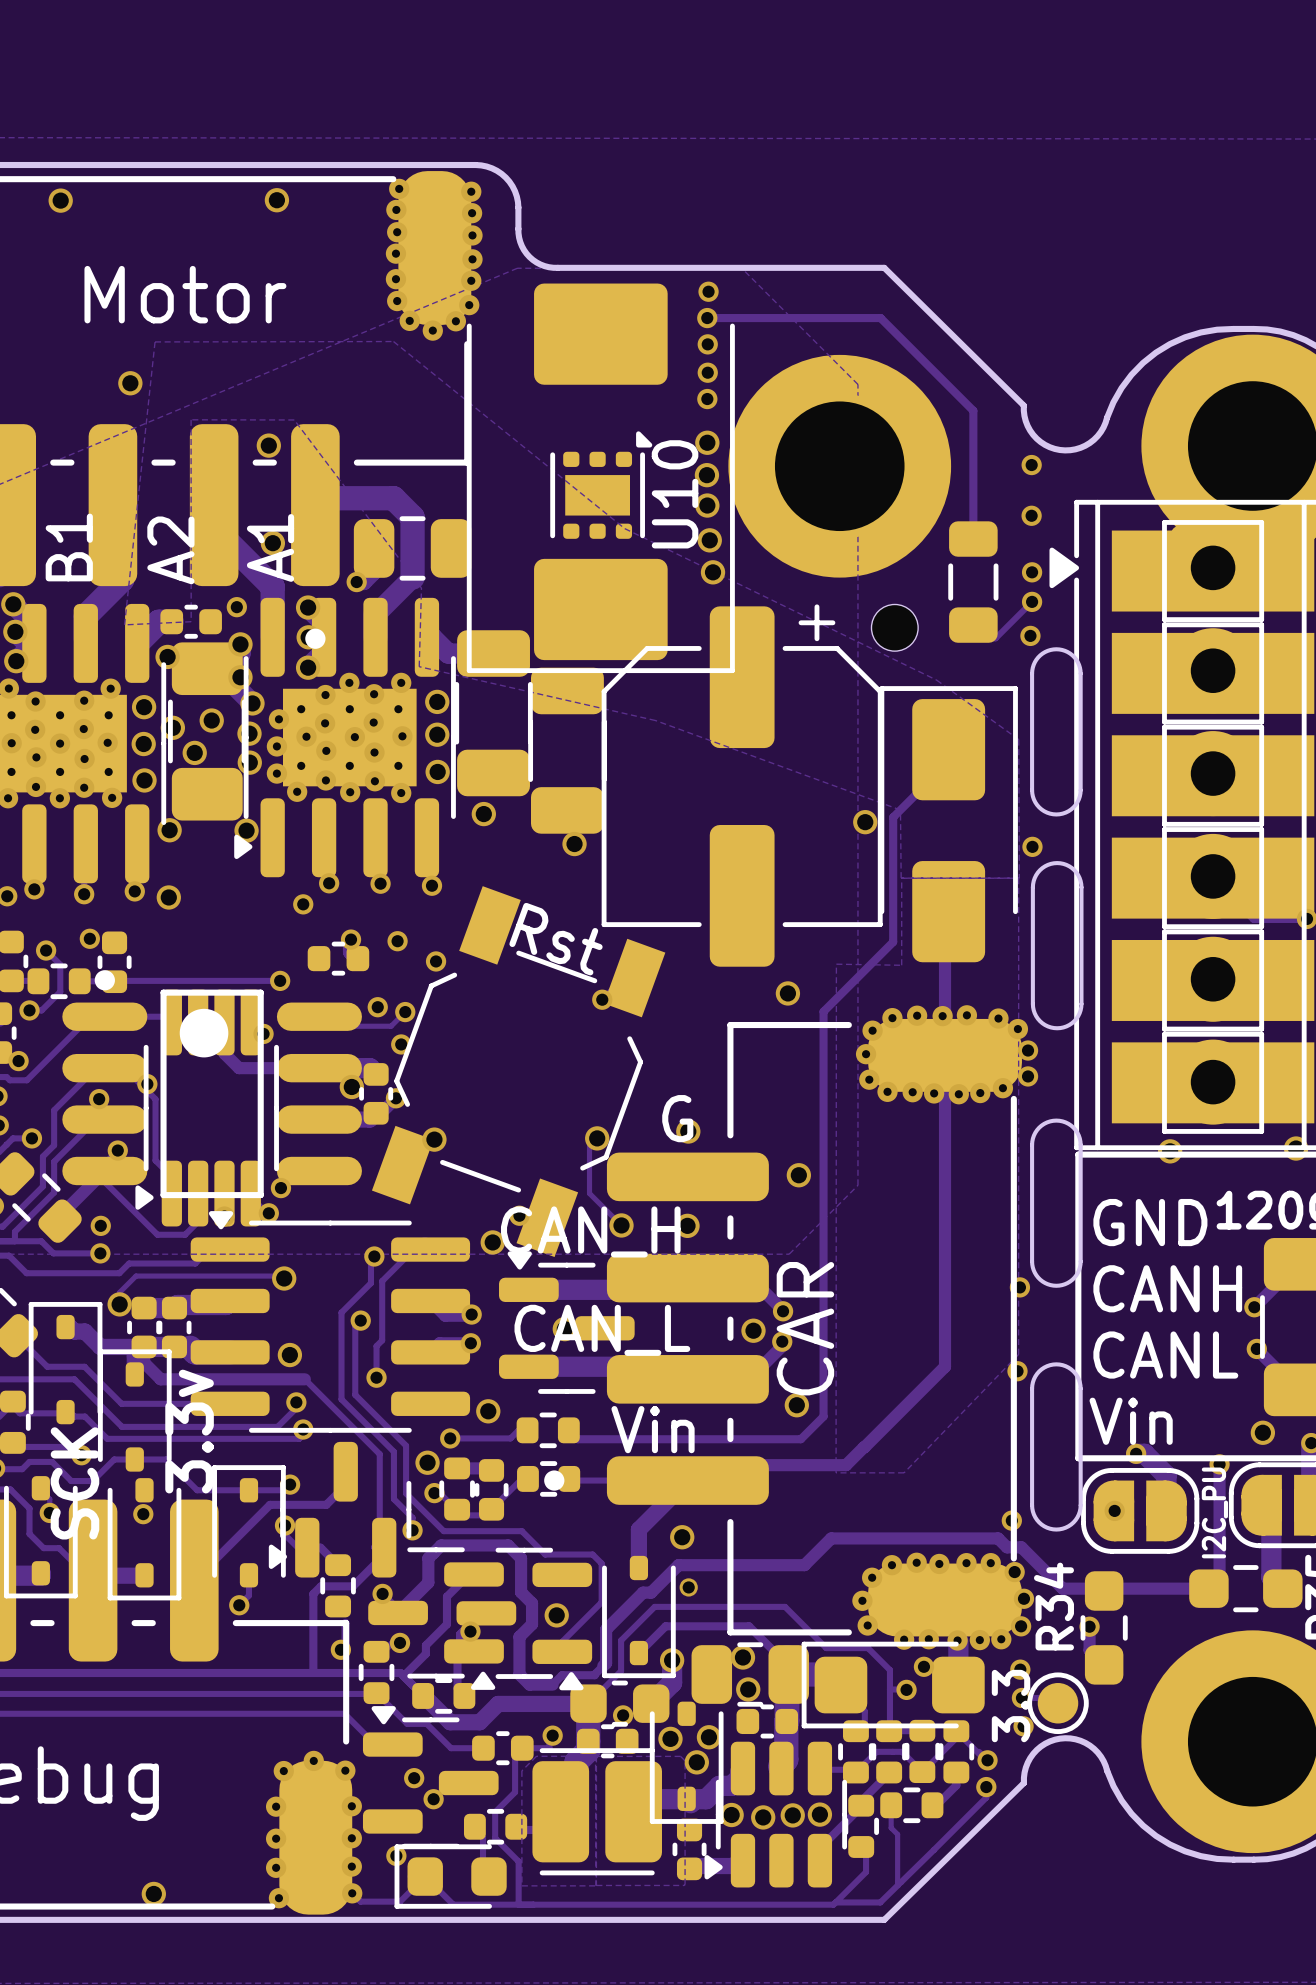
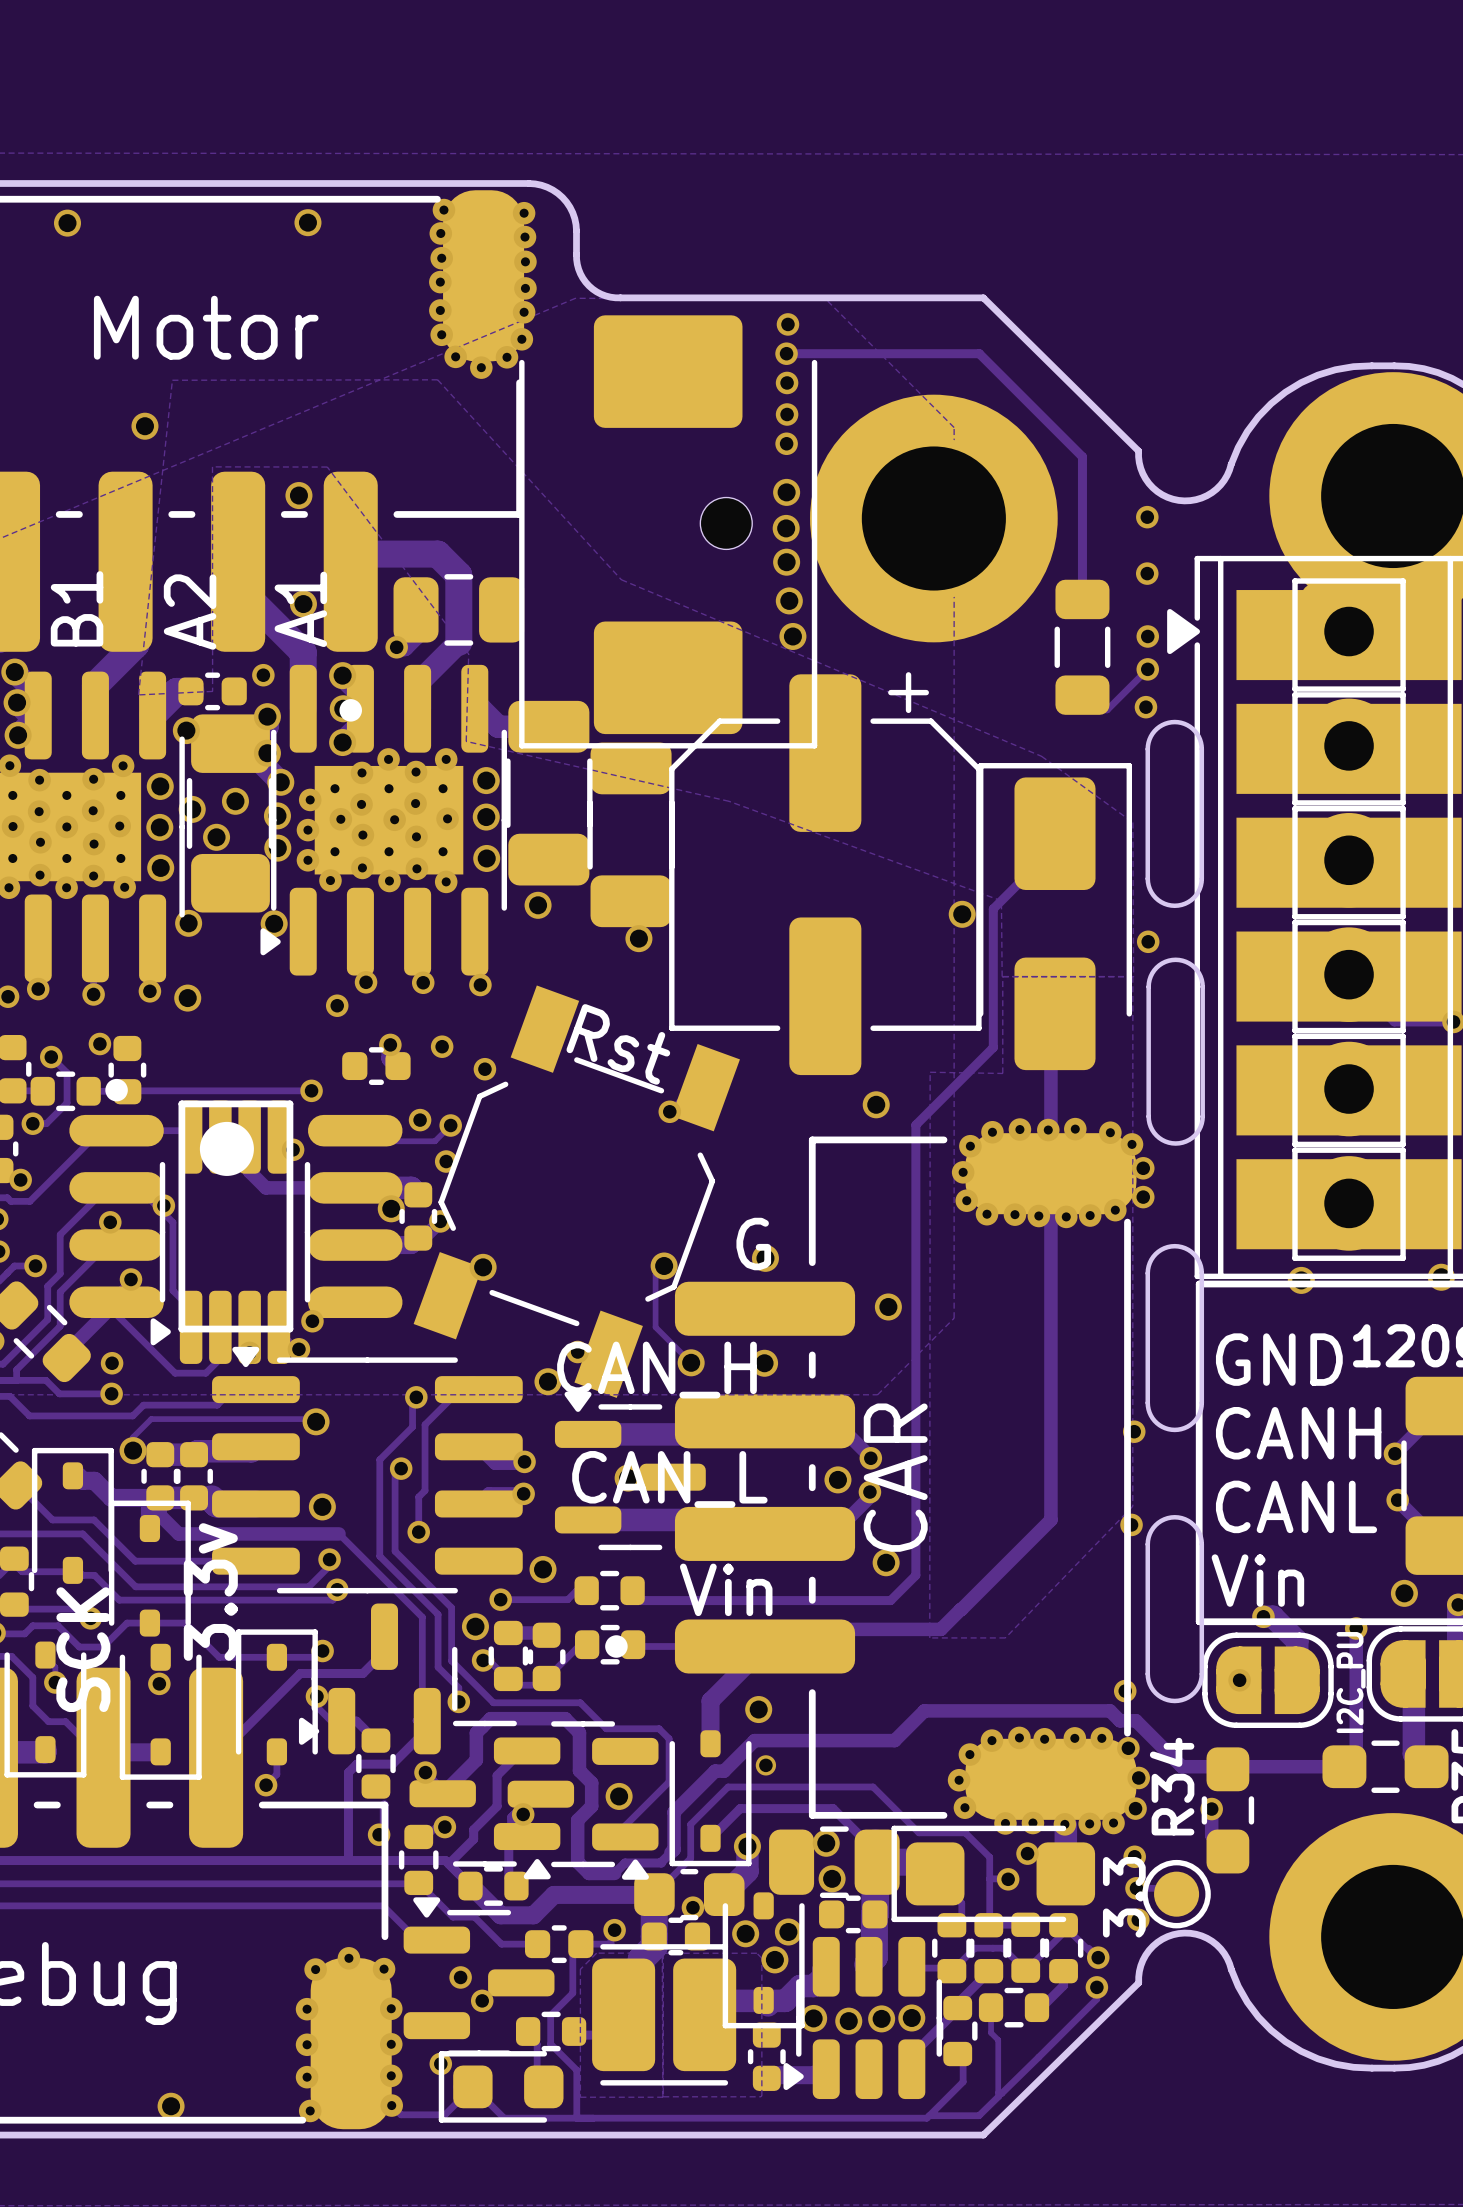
zone outline: (393, 341) (624, 528) (936, 680) -> (437, 379) (621, 579) (1041, 756)
U10: (601, 485) -> none
part position: (894, 627) -> (726, 523)

